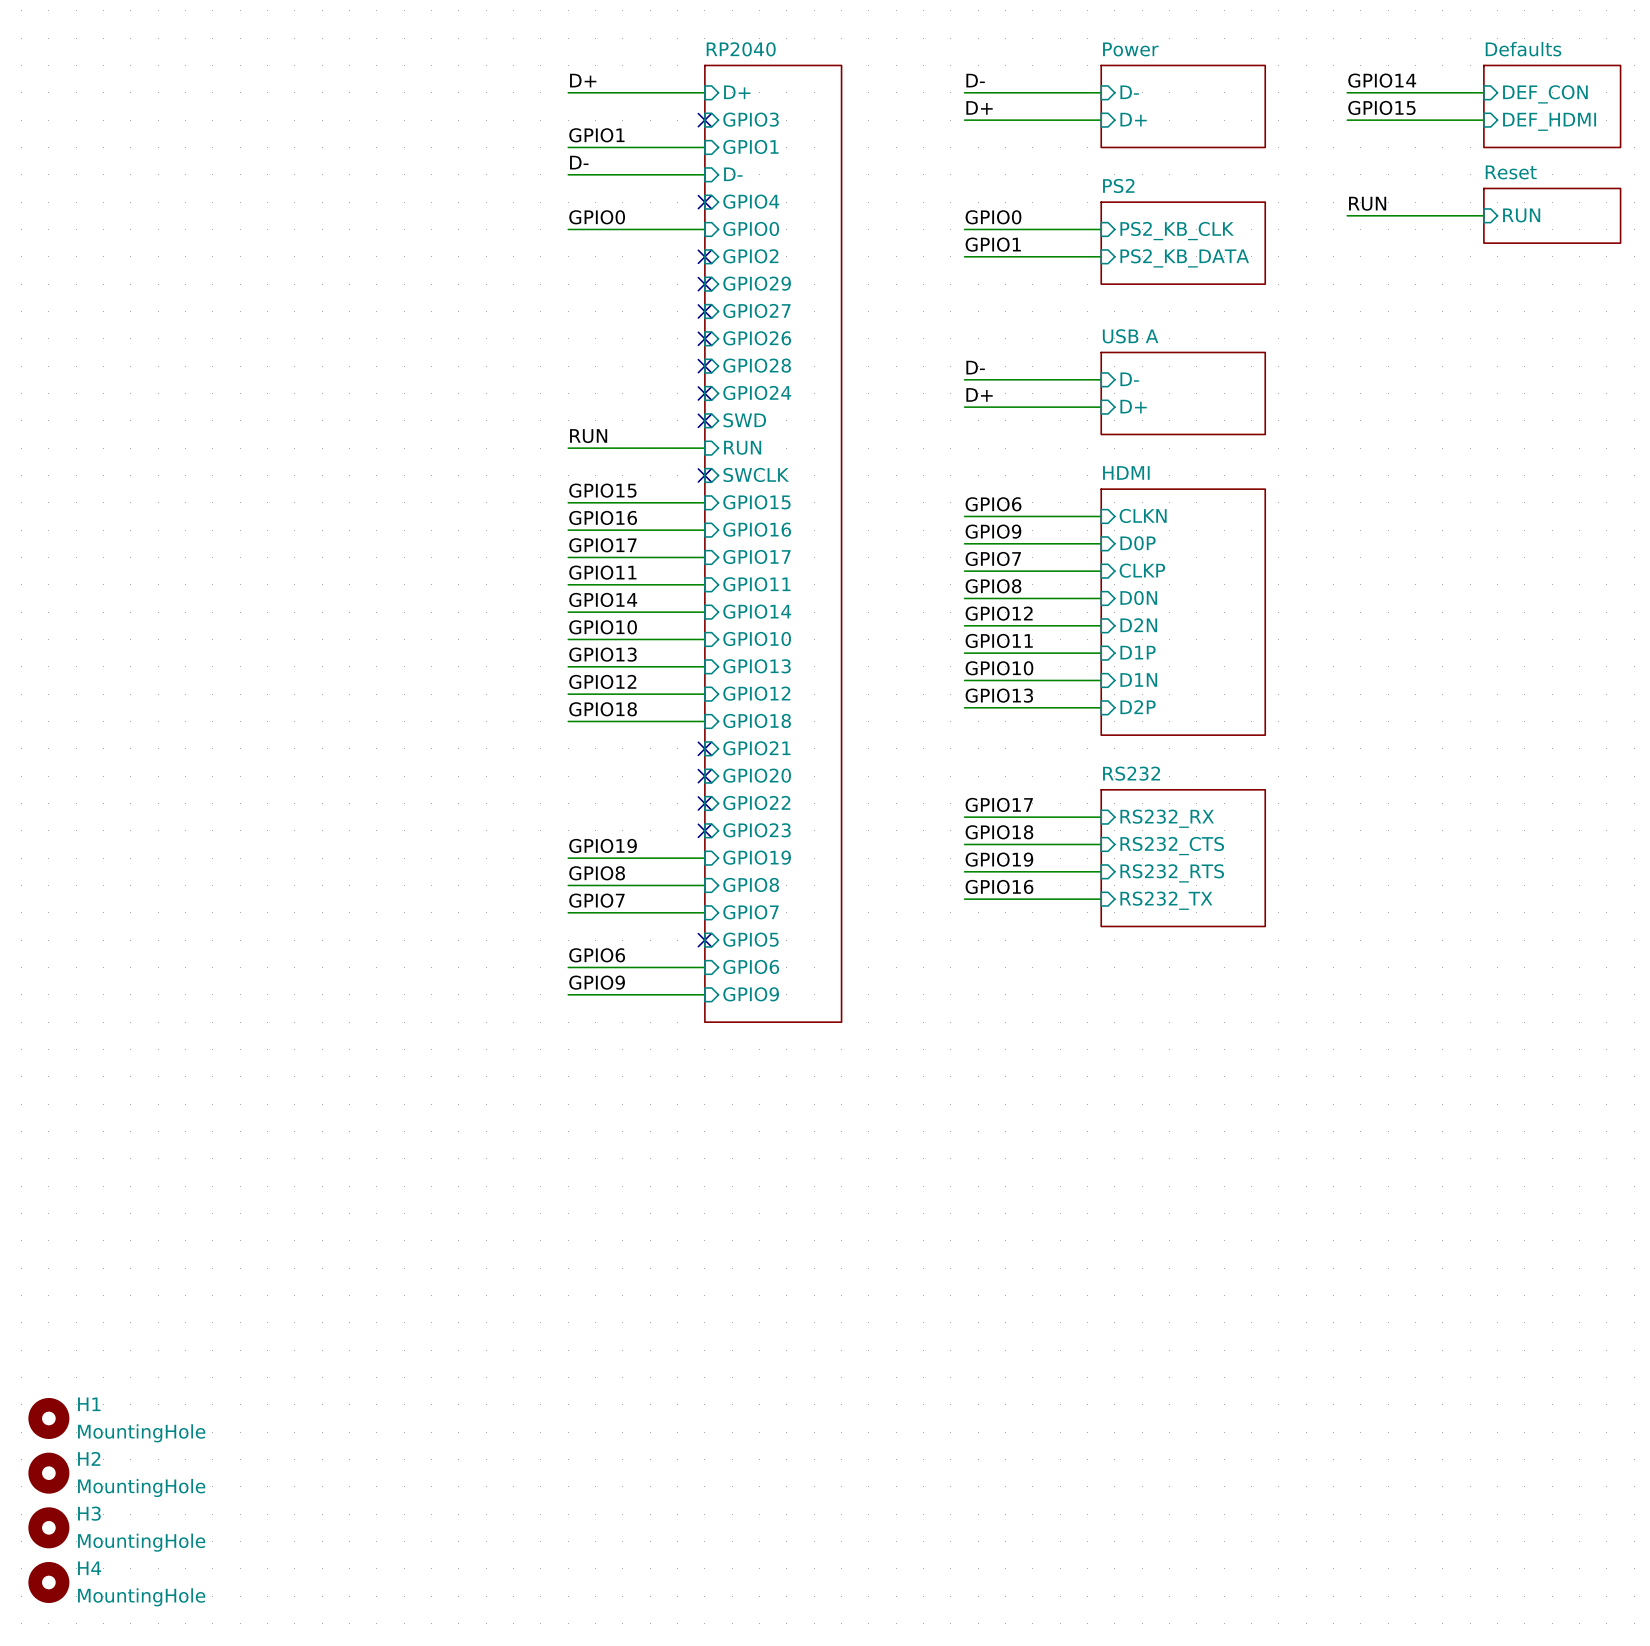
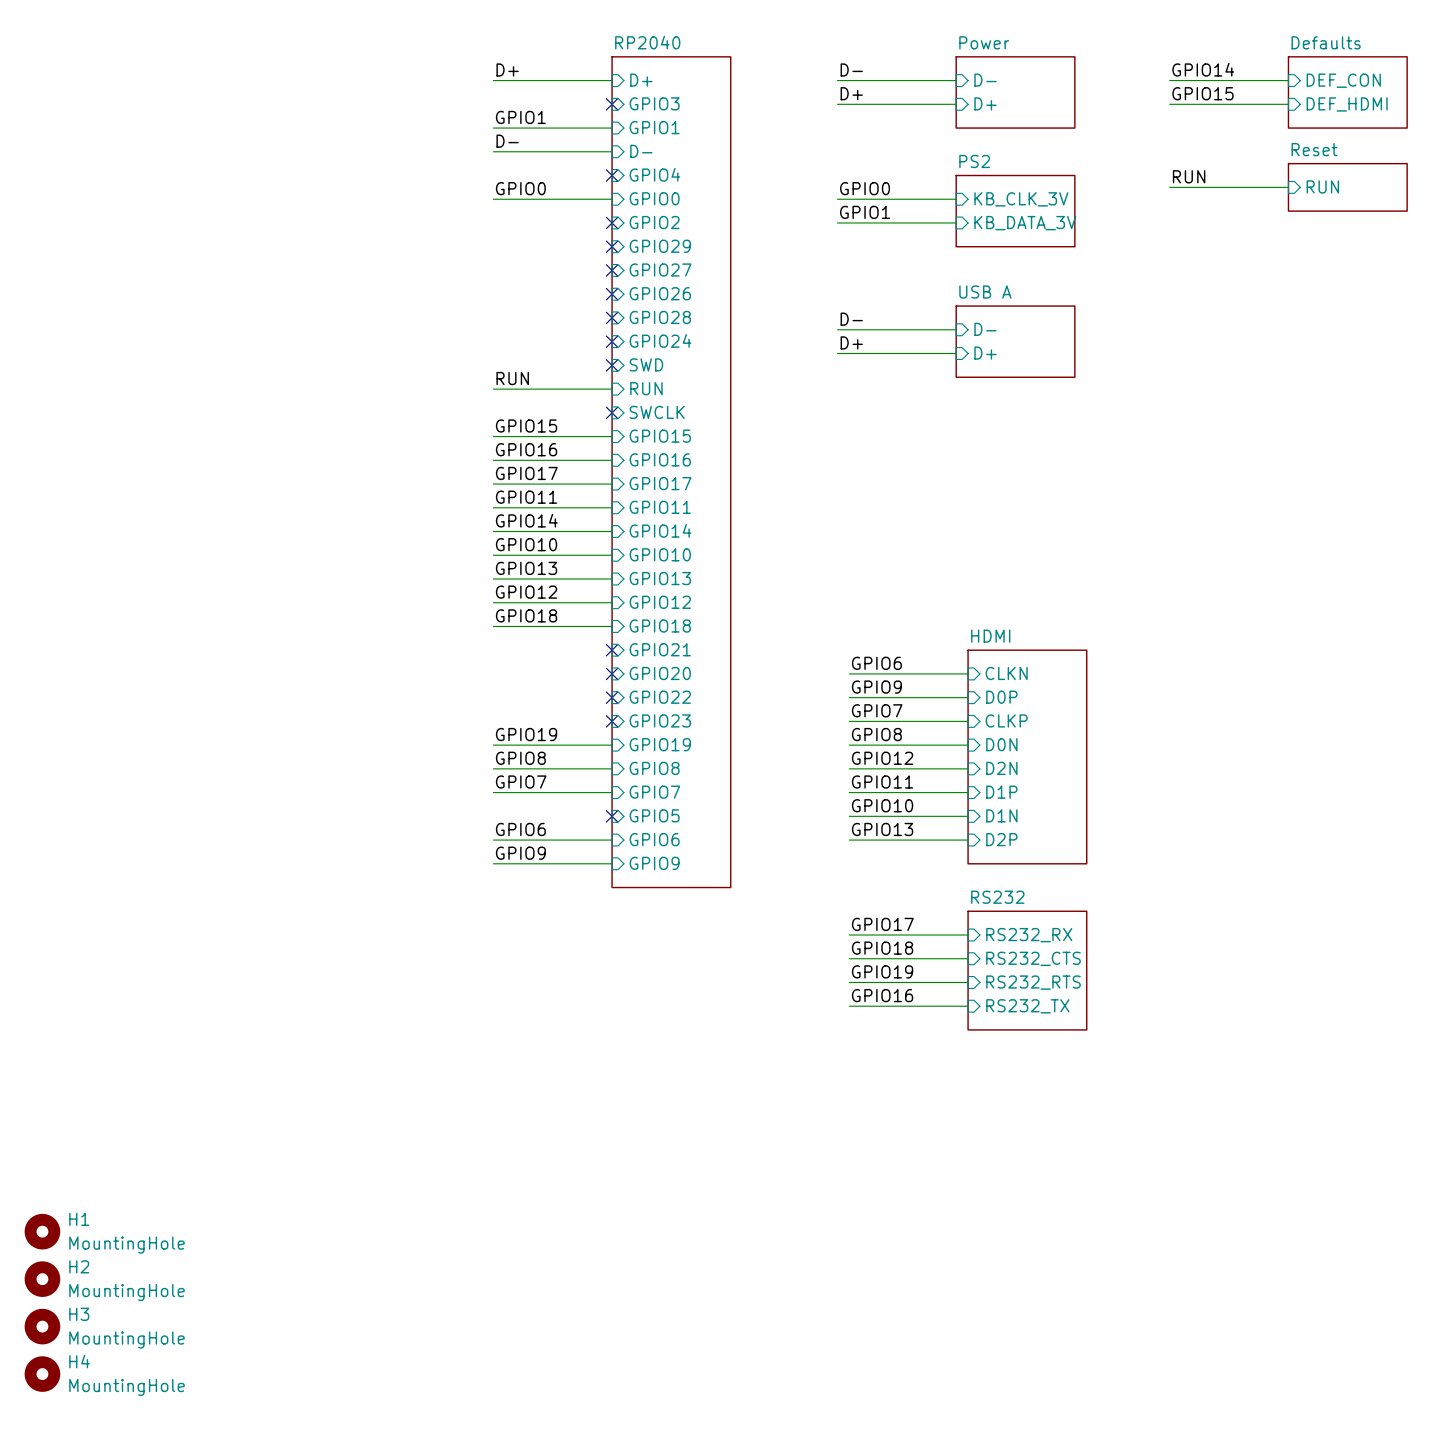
sheet Power: none -> (1015, 92)
sheet Power: (1183, 106) -> none
sheet PS2 shape: [1100, 201, 1267, 285] -> [955, 174, 1076, 248]
sheet pin: PS2_KB_CLK (1177, 231) -> KB_CLK_3V (1021, 199)
sheet pin: PS2_KB_DATA (1184, 258) -> KB_DATA_3V (1025, 223)
sheet USB A: none -> (1015, 341)
sheet USB A: (1183, 393) -> none
label position: GPIO6 (993, 504) -> GPIO6 (876, 663)
sheet pin position: CLKN (1143, 515) -> CLKN (1006, 673)
wire: (964, 516) (1101, 516) -> (849, 673) (968, 673)
label position: GPIO9 (993, 531) -> GPIO9 (876, 687)
wire: (964, 543) (1101, 543) -> (849, 697) (968, 697)
sheet pin position: D0P (1138, 543) -> D0P (1001, 697)
label position: GPIO7 (993, 558) -> GPIO7 (877, 710)
sheet pin position: CLKP (1142, 570) -> CLKP (1006, 720)
wire: (964, 571) (1101, 571) -> (849, 721) (968, 721)
label position: GPIO8 (993, 586) -> GPIO8 (876, 734)
sheet pin position: D0N (1138, 597) -> D0N (1001, 744)
wire: (964, 598) (1101, 598) -> (849, 745) (968, 745)
sheet HDMI: (1183, 612) -> none
label position: GPIO12 (999, 613) -> GPIO12 (882, 758)
wire: (964, 625) (1101, 625) -> (849, 768) (968, 768)
sheet pin position: D2N (1138, 625) -> D2N (1001, 768)
label position: GPIO11 (999, 640) -> GPIO11 (882, 782)
sheet pin position: D1P (1138, 652) -> D1P (1001, 792)
wire: (964, 653) (1101, 653) -> (849, 792) (968, 792)
label position: GPIO10 (999, 668) -> GPIO10 (882, 805)
sheet pin position: D1N (1138, 679) -> D1N (1001, 815)
wire: (964, 680) (1101, 680) -> (849, 816) (968, 816)
label position: GPIO13 (999, 695) -> GPIO13 (882, 829)
wire: (964, 707) (1101, 707) -> (849, 840) (968, 840)
sheet pin position: D2P (1138, 707) -> D2P (1001, 839)
sheet RS232 shape: [1100, 788, 1267, 928] -> [967, 910, 1088, 1031]
label position: GPIO17 (999, 804) -> GPIO17 (882, 924)
wire: (964, 817) (1101, 817) -> (849, 935) (968, 935)
sheet pin position: RS232_RX (1167, 818) -> RS232_RX (1029, 935)
label position: GPIO18 (999, 832) -> GPIO18 (882, 948)
wire: (964, 844) (1101, 844) -> (849, 958) (968, 958)
sheet pin position: RS232_CTS (1172, 846) -> RS232_CTS (1033, 958)
label position: GPIO19 (999, 859) -> GPIO19 (882, 971)
wire: (964, 871) (1101, 871) -> (849, 982) (968, 982)
sheet HDMI: none -> (1027, 756)
sheet pin position: RS232_RTS (1172, 873) -> RS232_RTS (1033, 982)
label position: GPIO16 (999, 886) -> GPIO16 (882, 995)
wire: (964, 899) (1101, 899) -> (849, 1006) (968, 1006)
sheet pin position: RS232_TX (1166, 900) -> RS232_TX (1027, 1006)

